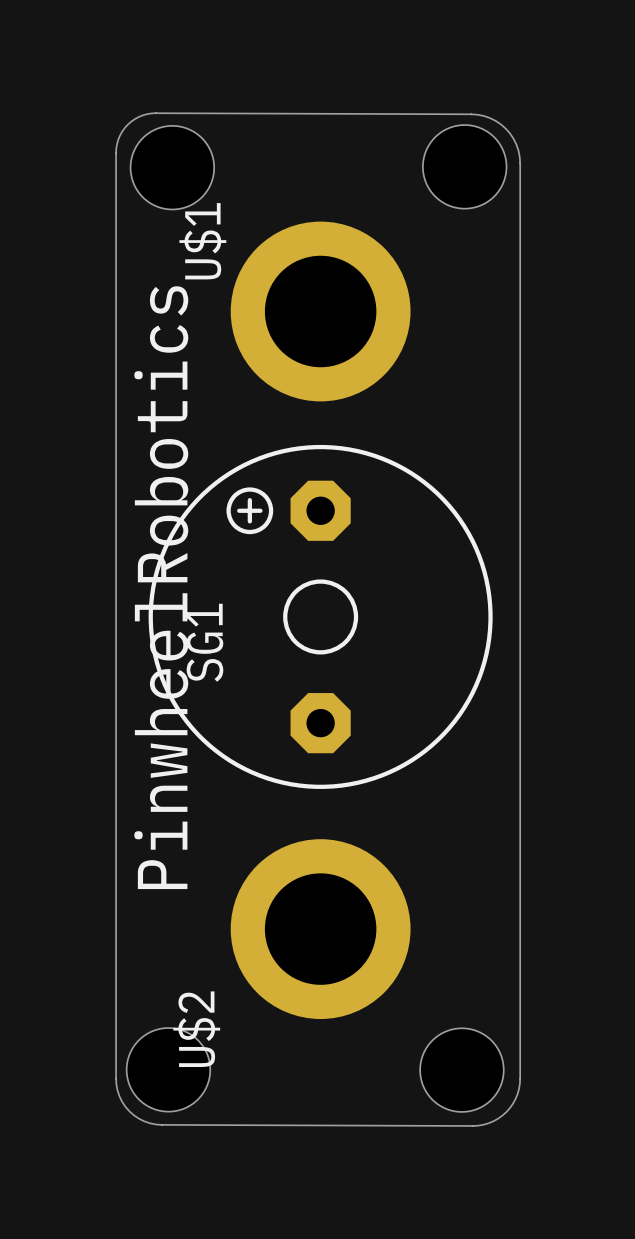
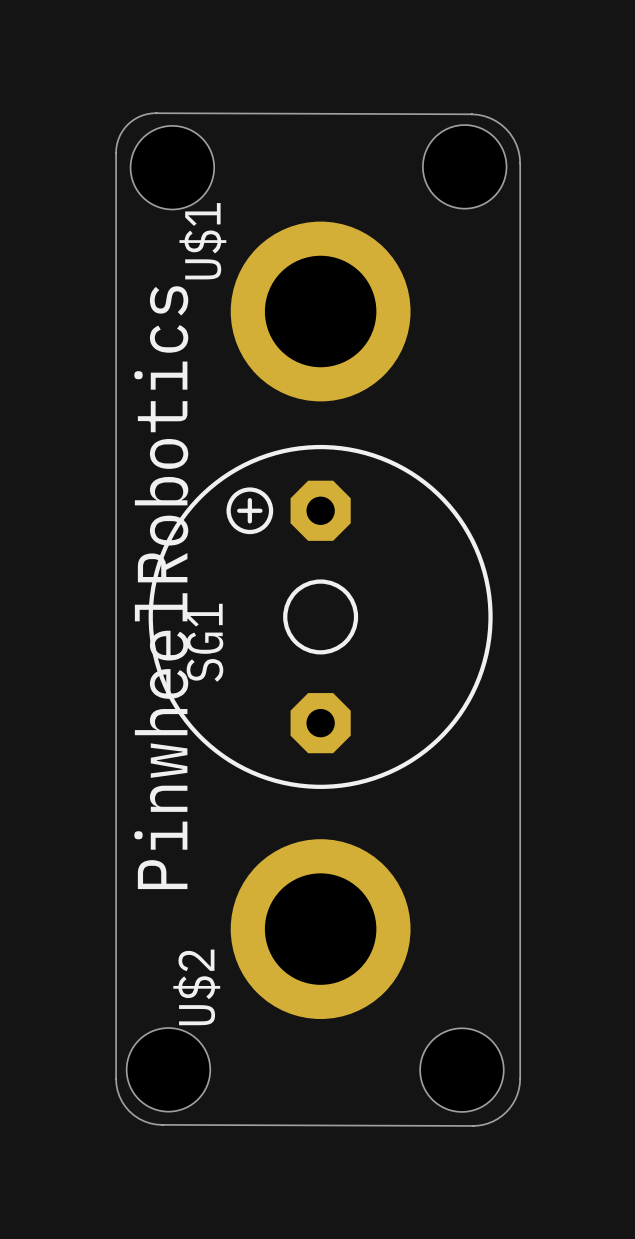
U$2 name position: U$2 (196, 1029) -> U$2 (196, 987)

